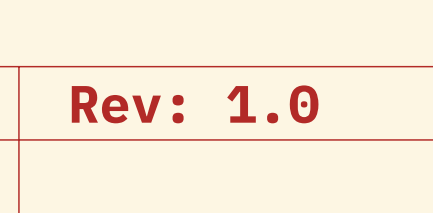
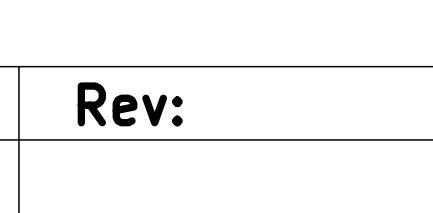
title block: Rev: 1.0 (195, 104) -> Rev: (130, 104)

